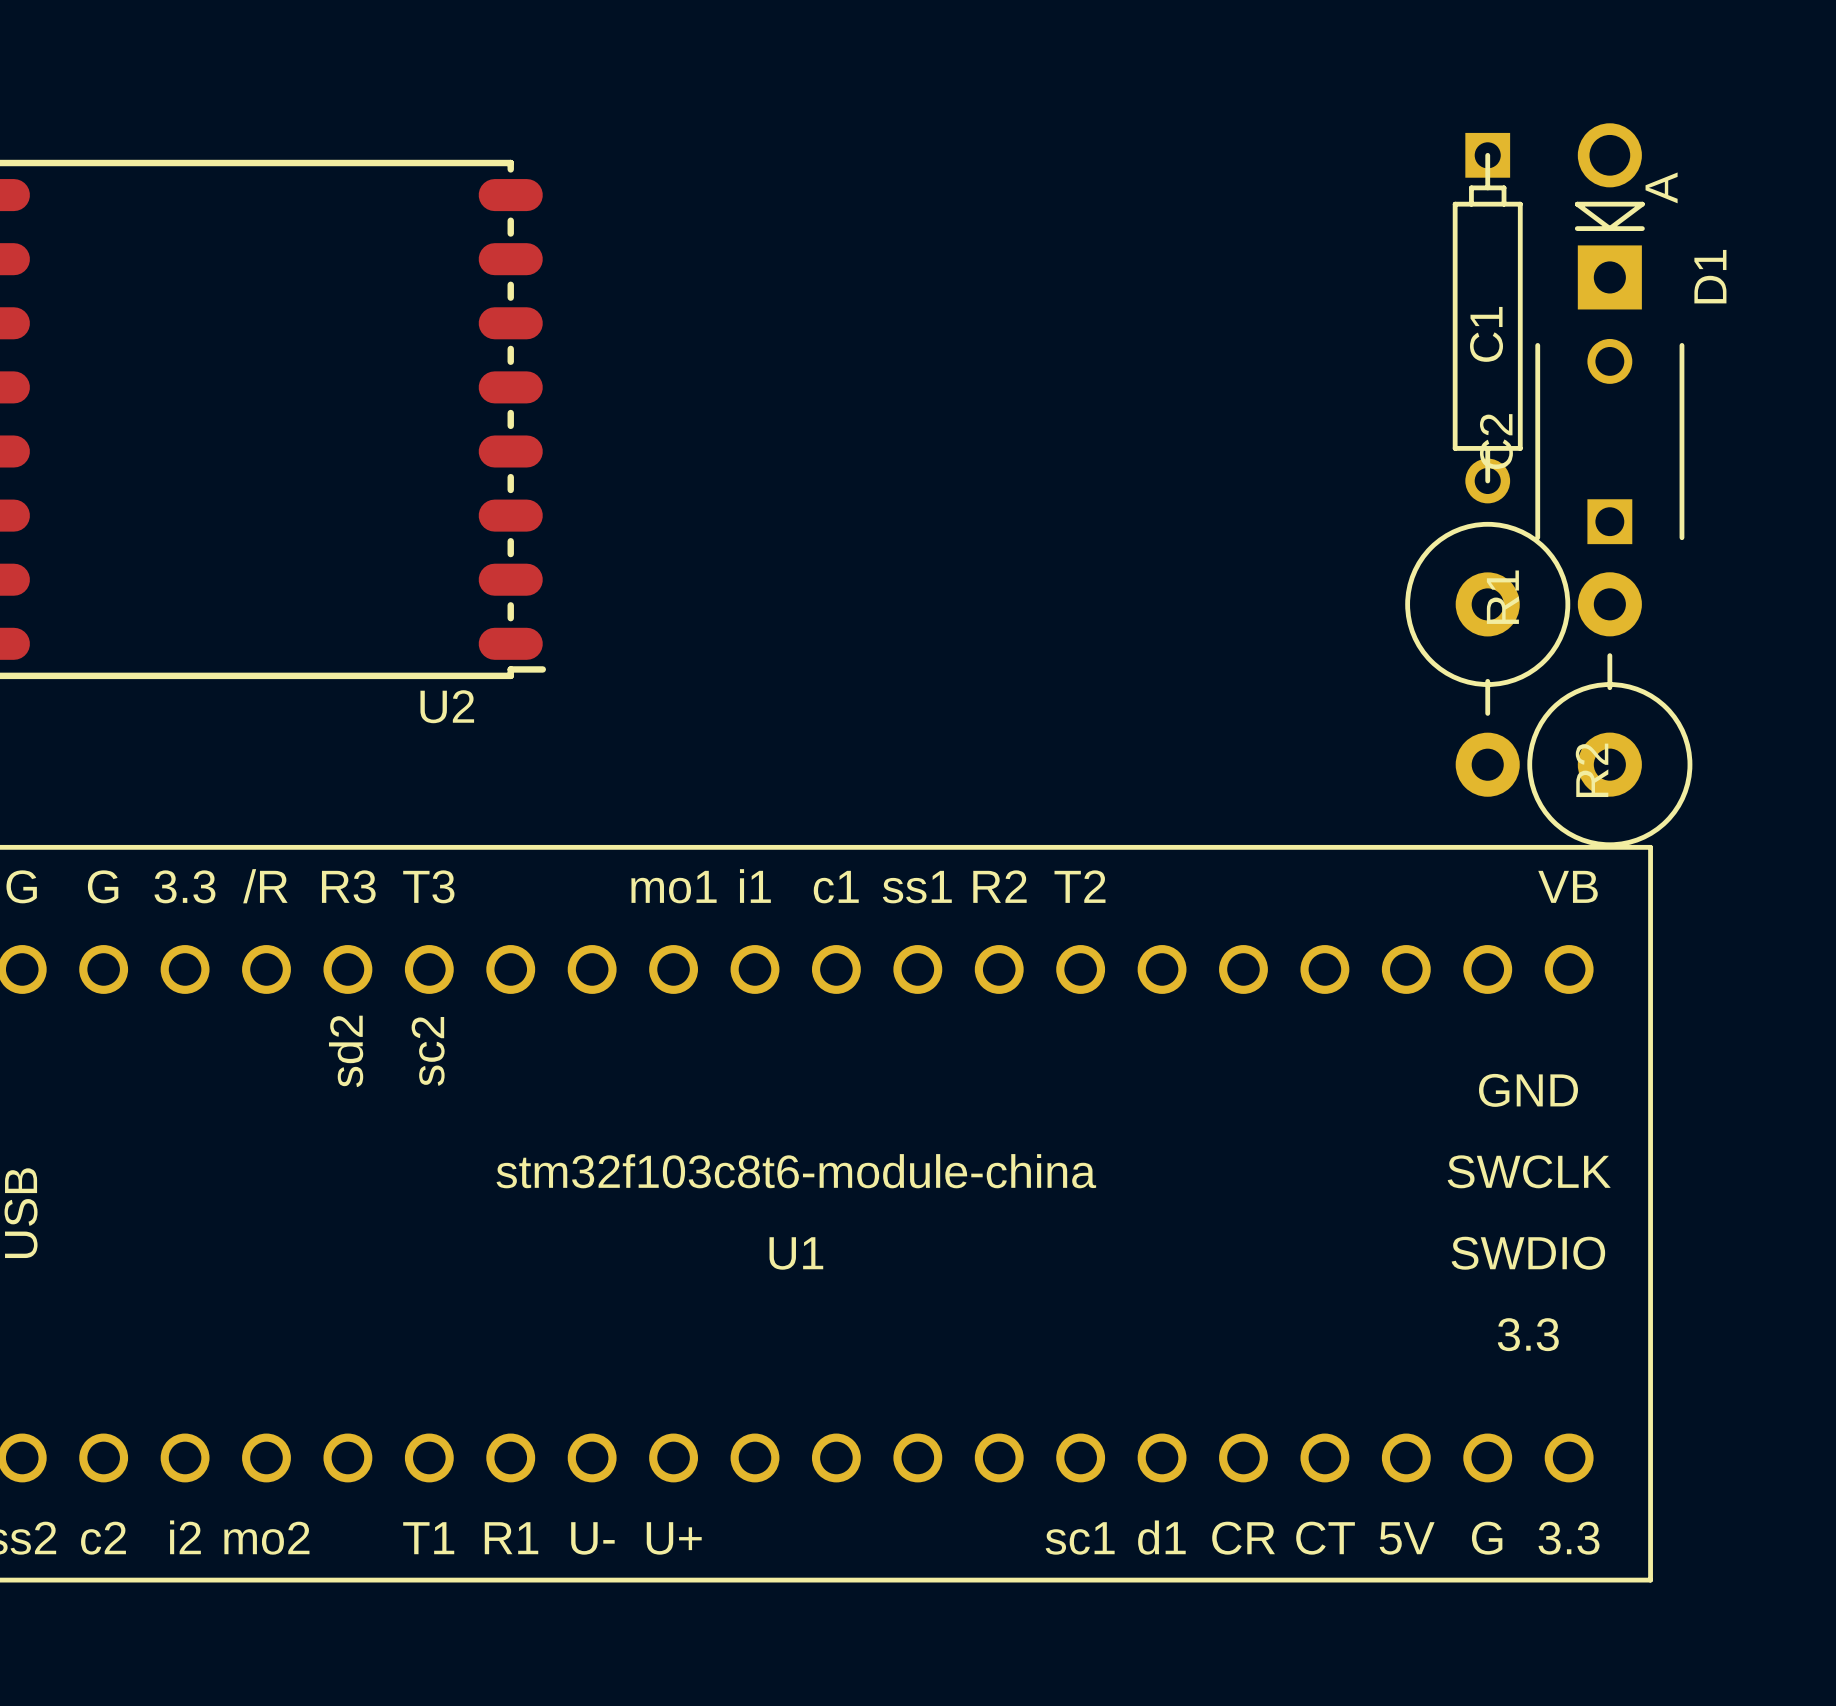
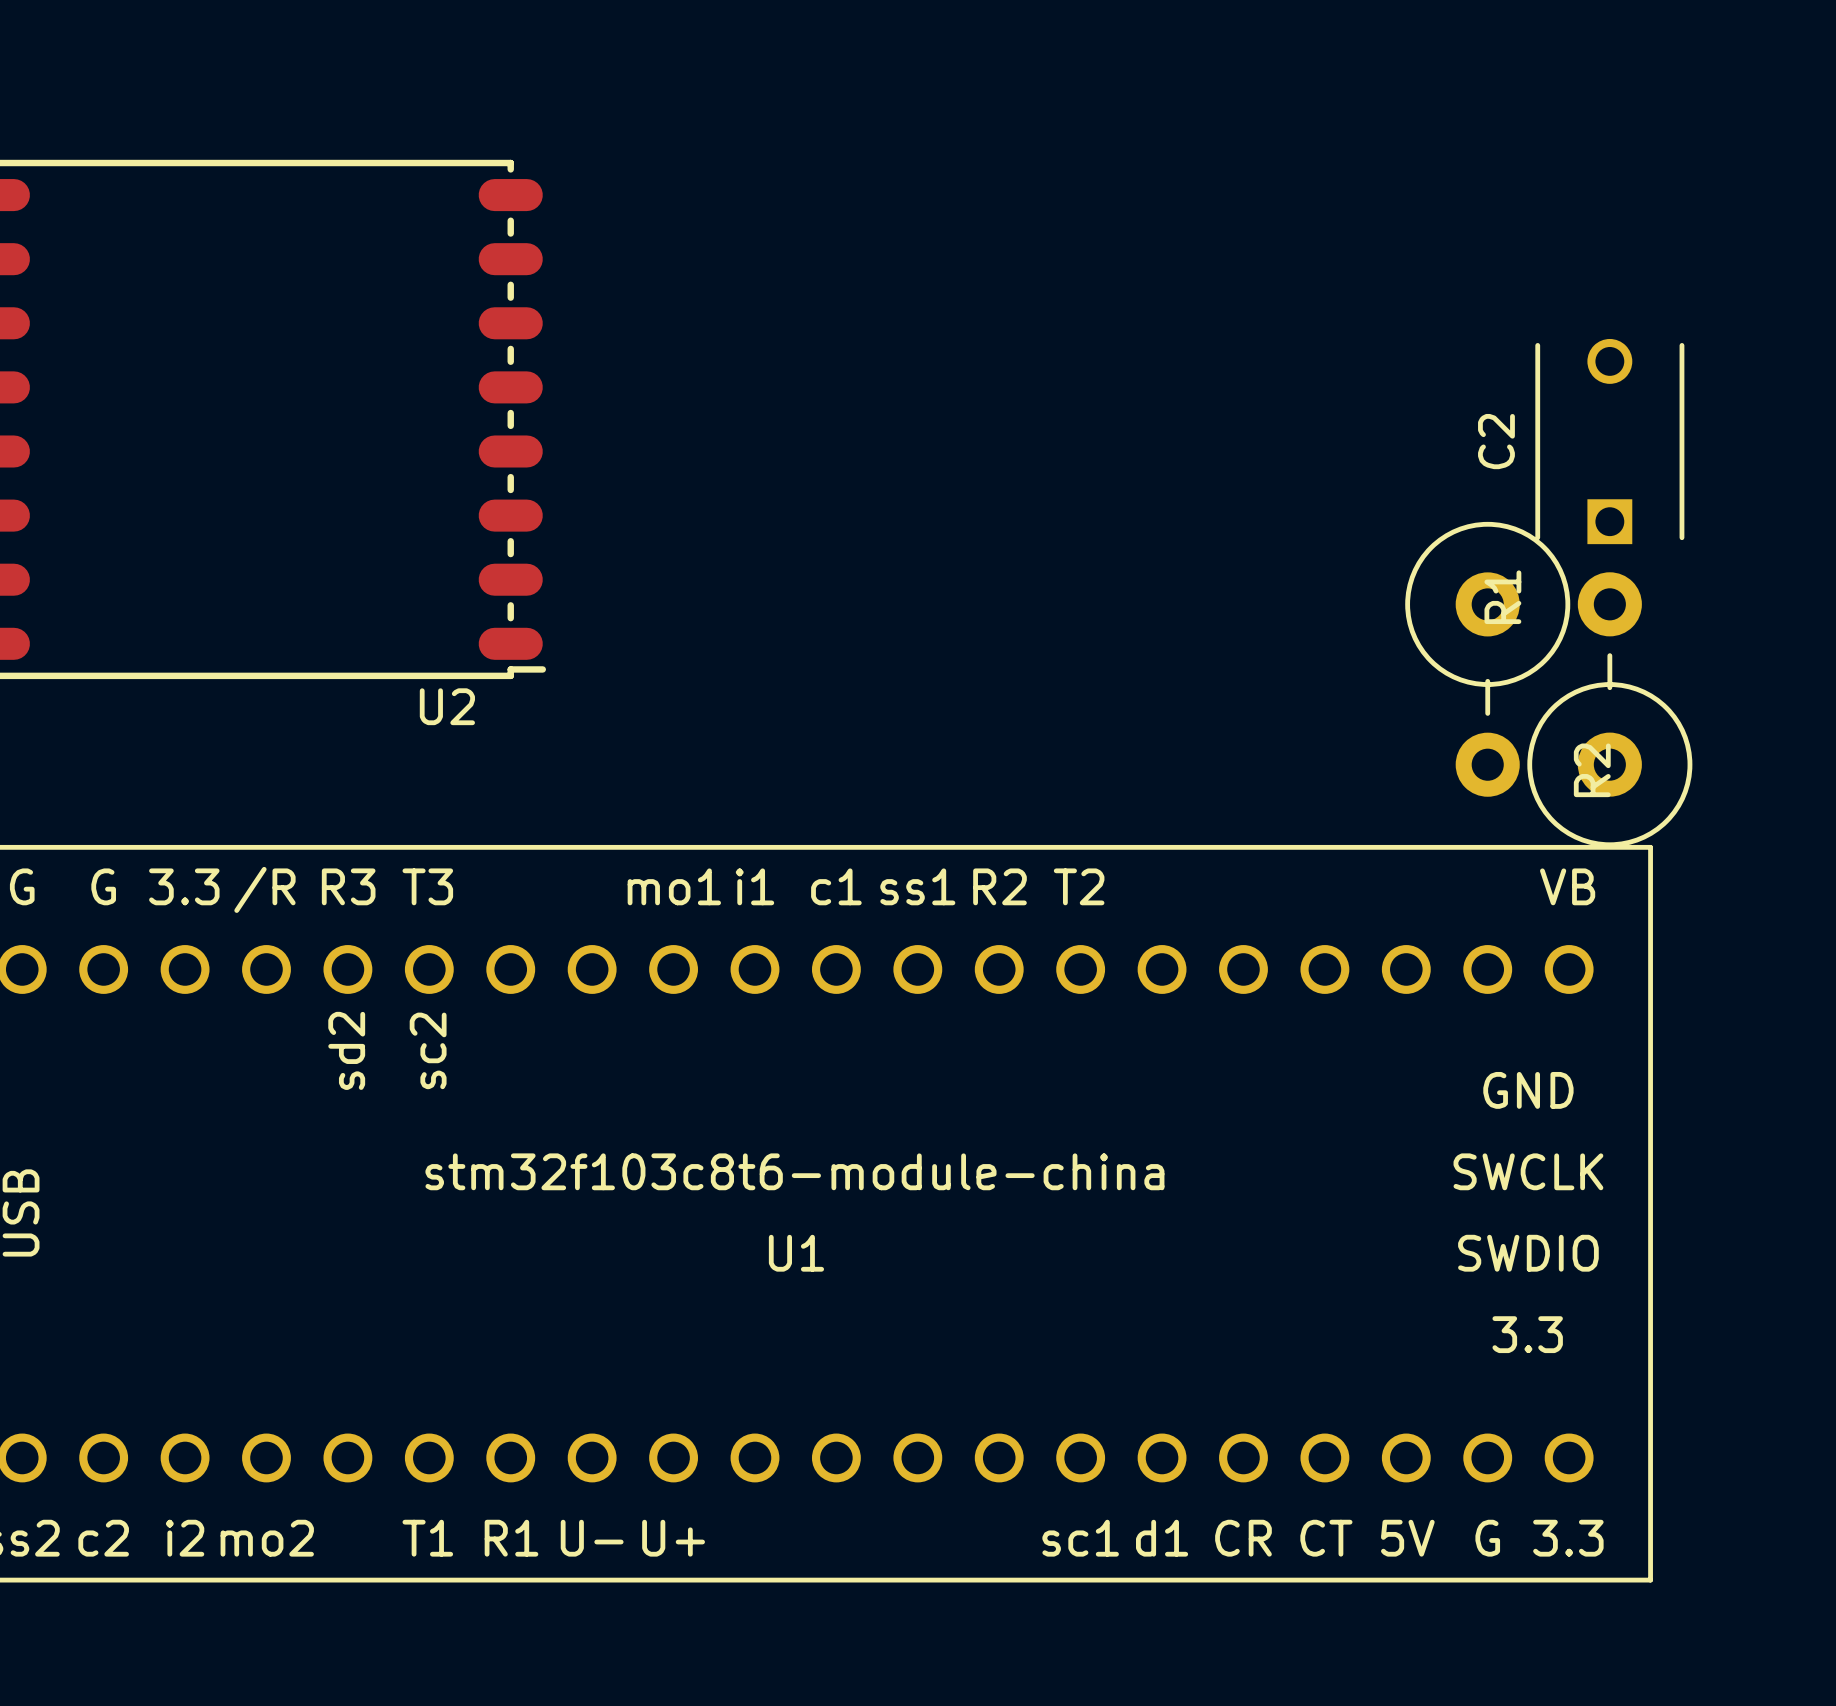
D1: (1609, 216) -> none
C1: (1487, 318) -> none

